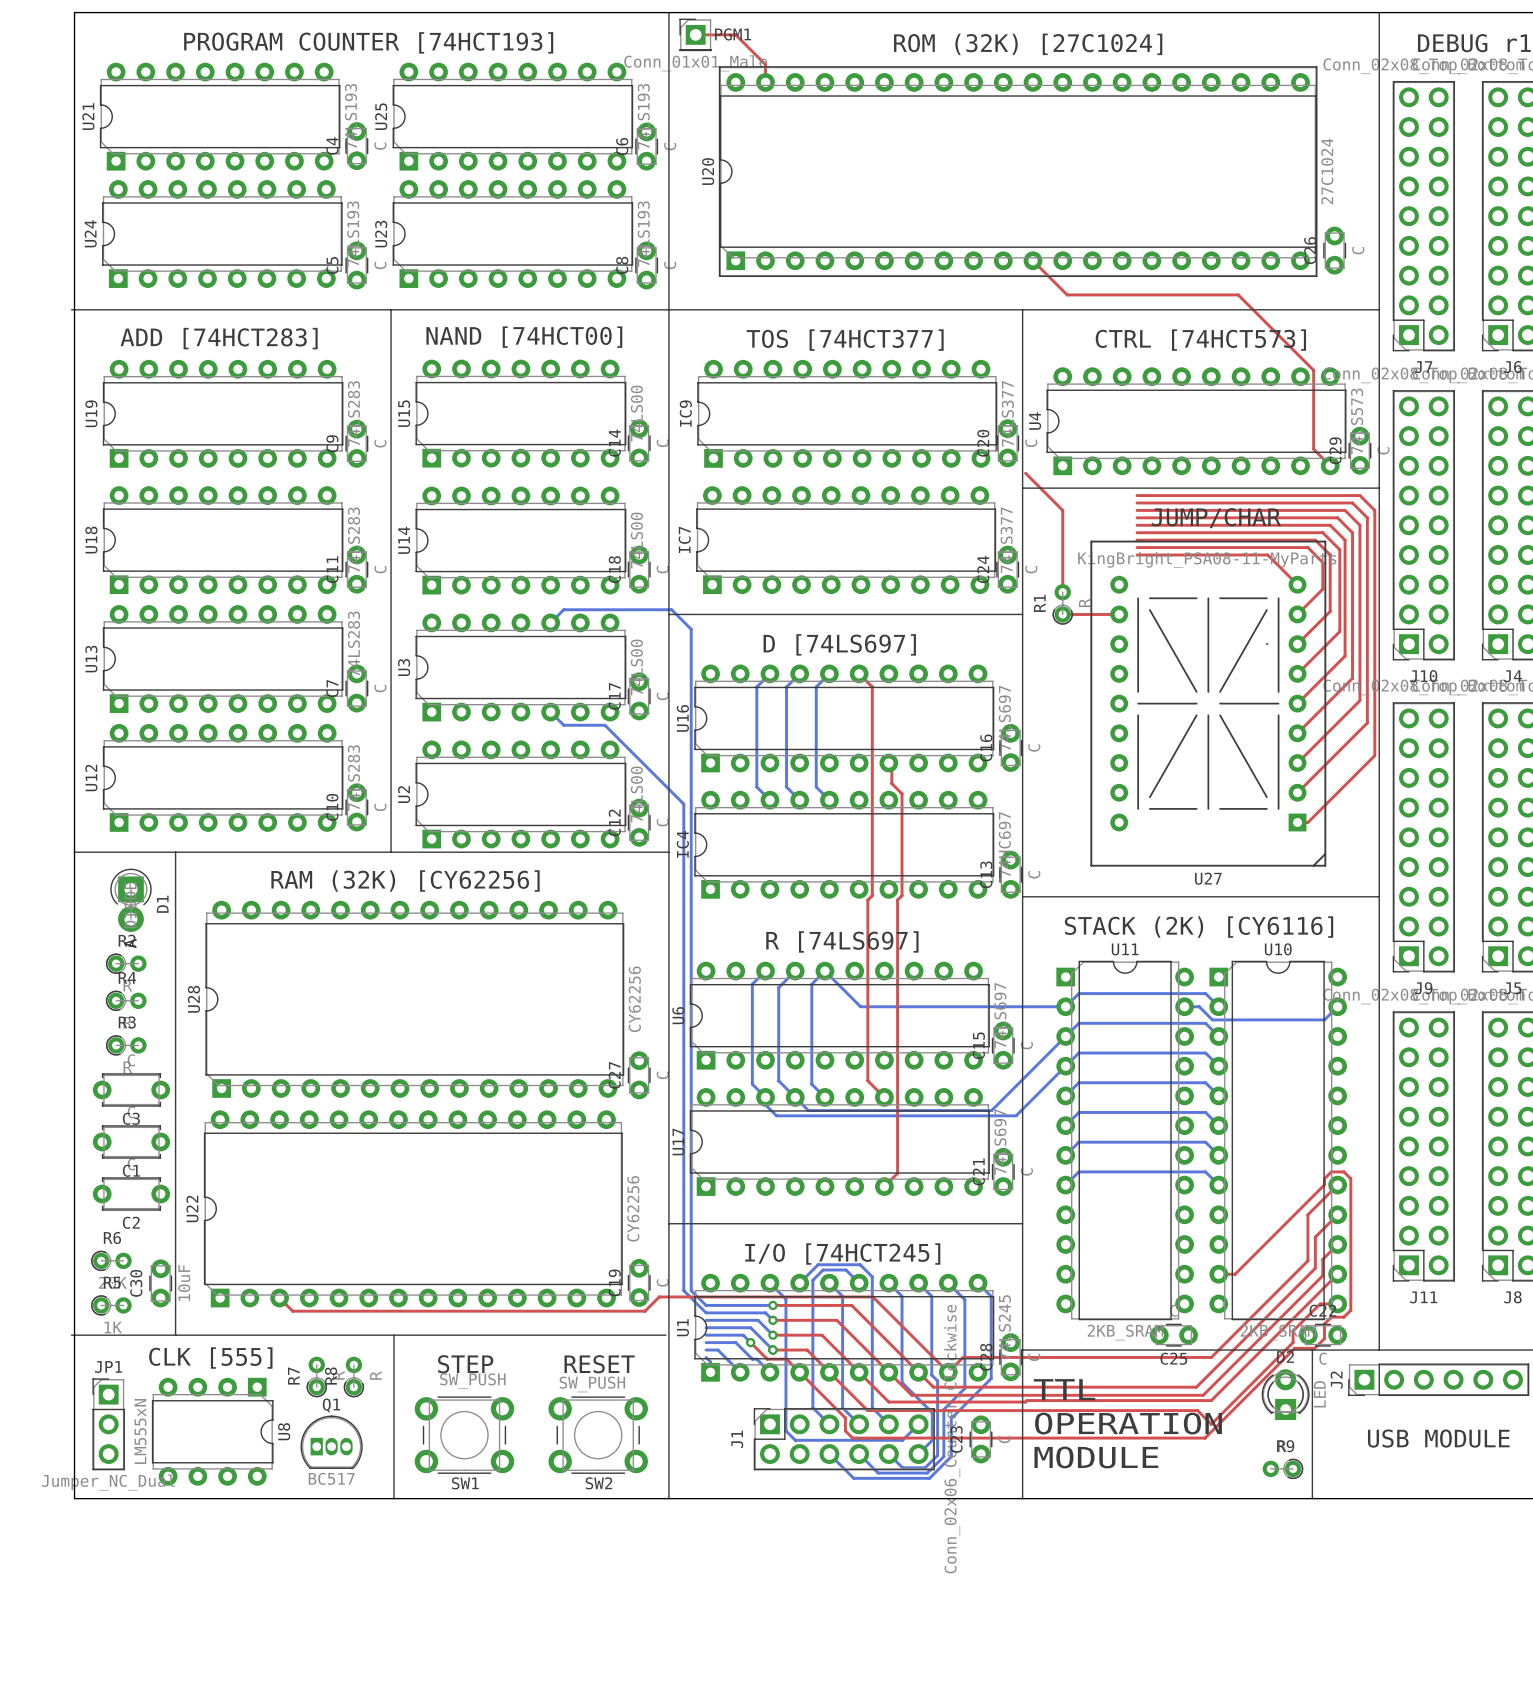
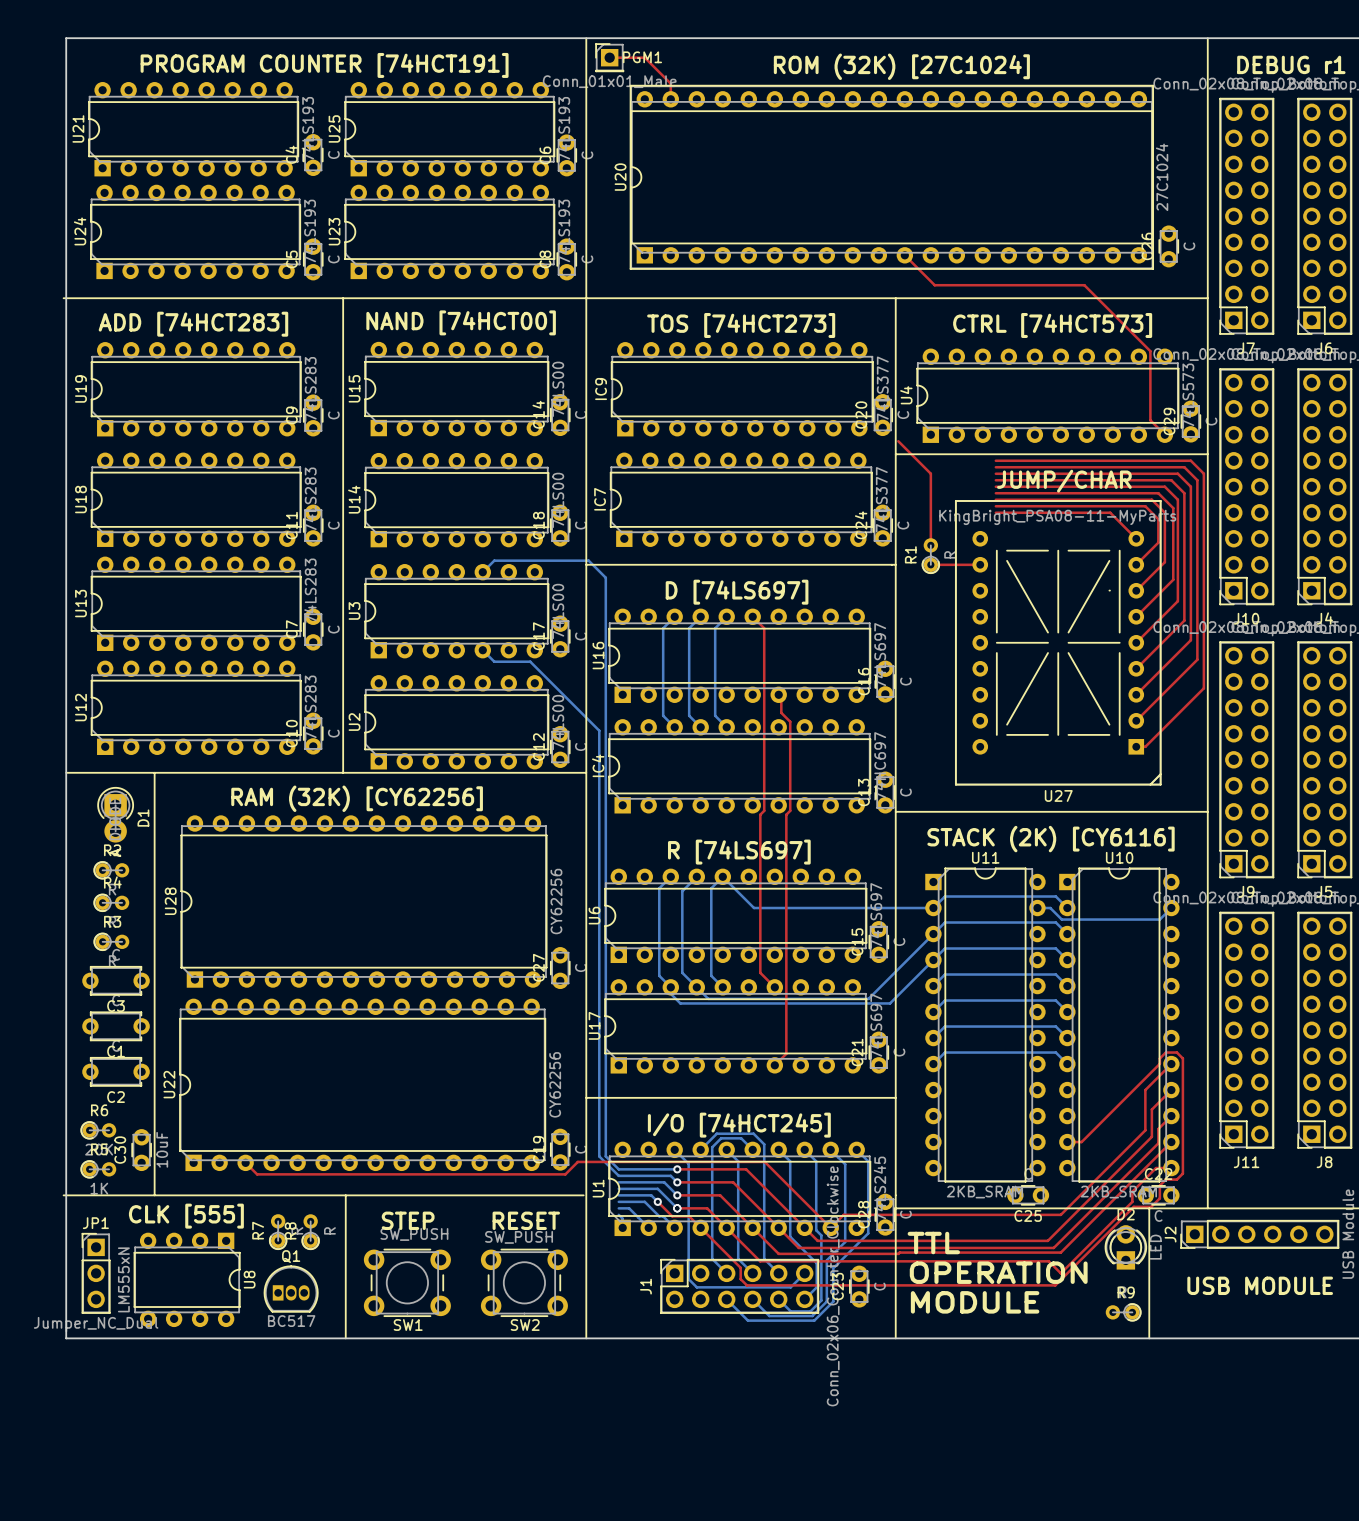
text: PROGRAM COUNTER [74HCT193] (368, 42) -> PROGRAM COUNTER [74HCT191] (324, 65)
text: TOS [74HCT377] (845, 340) -> TOS [74HCT273] (741, 325)

